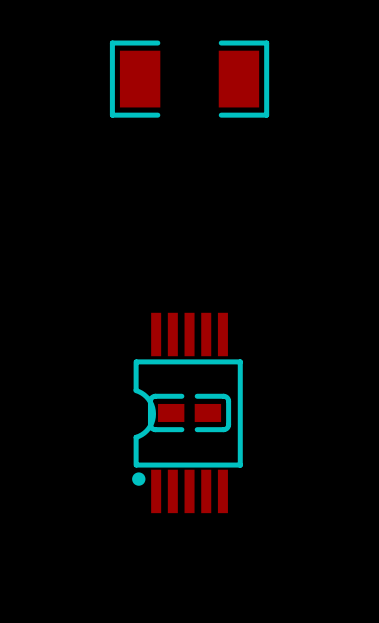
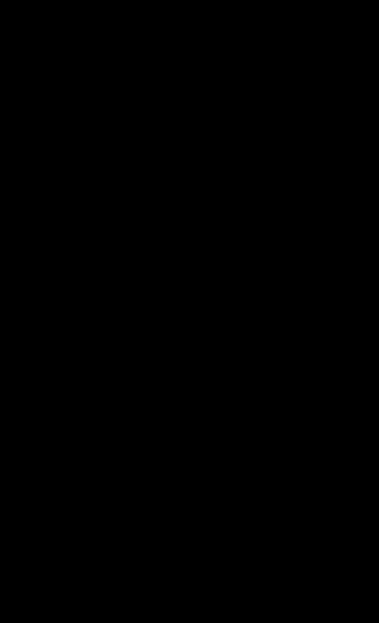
part: (189, 79) -> none
part: (187, 412) -> none
part: (189, 412) -> none

